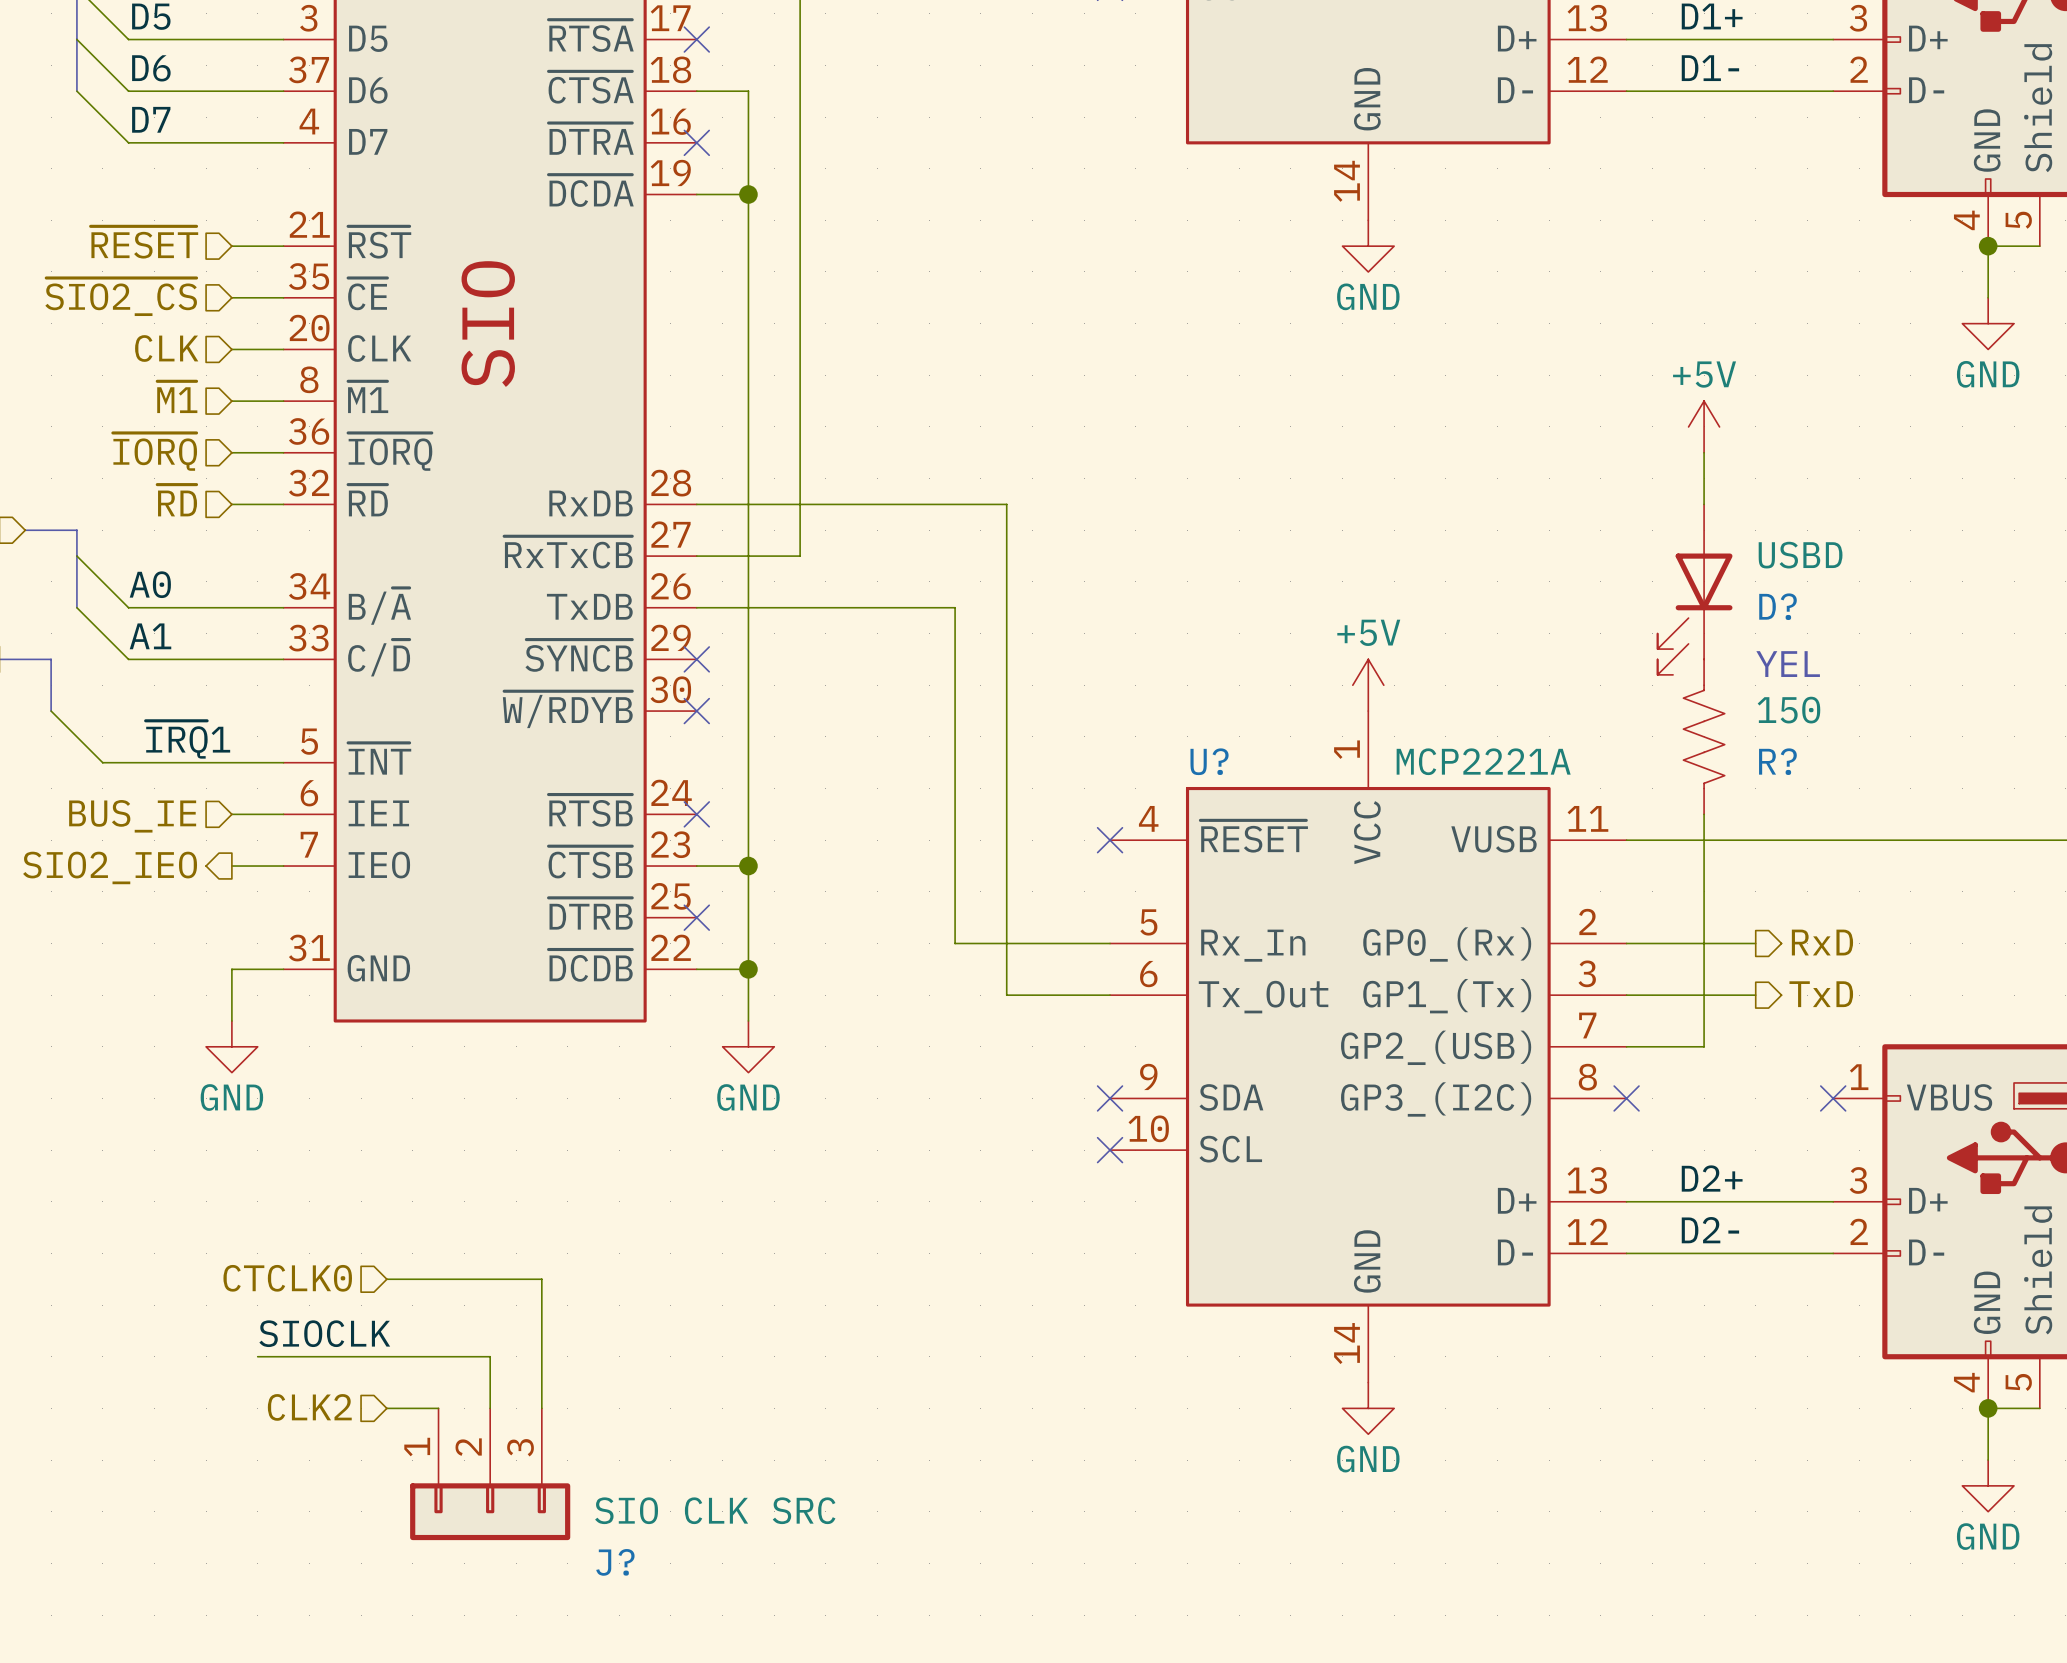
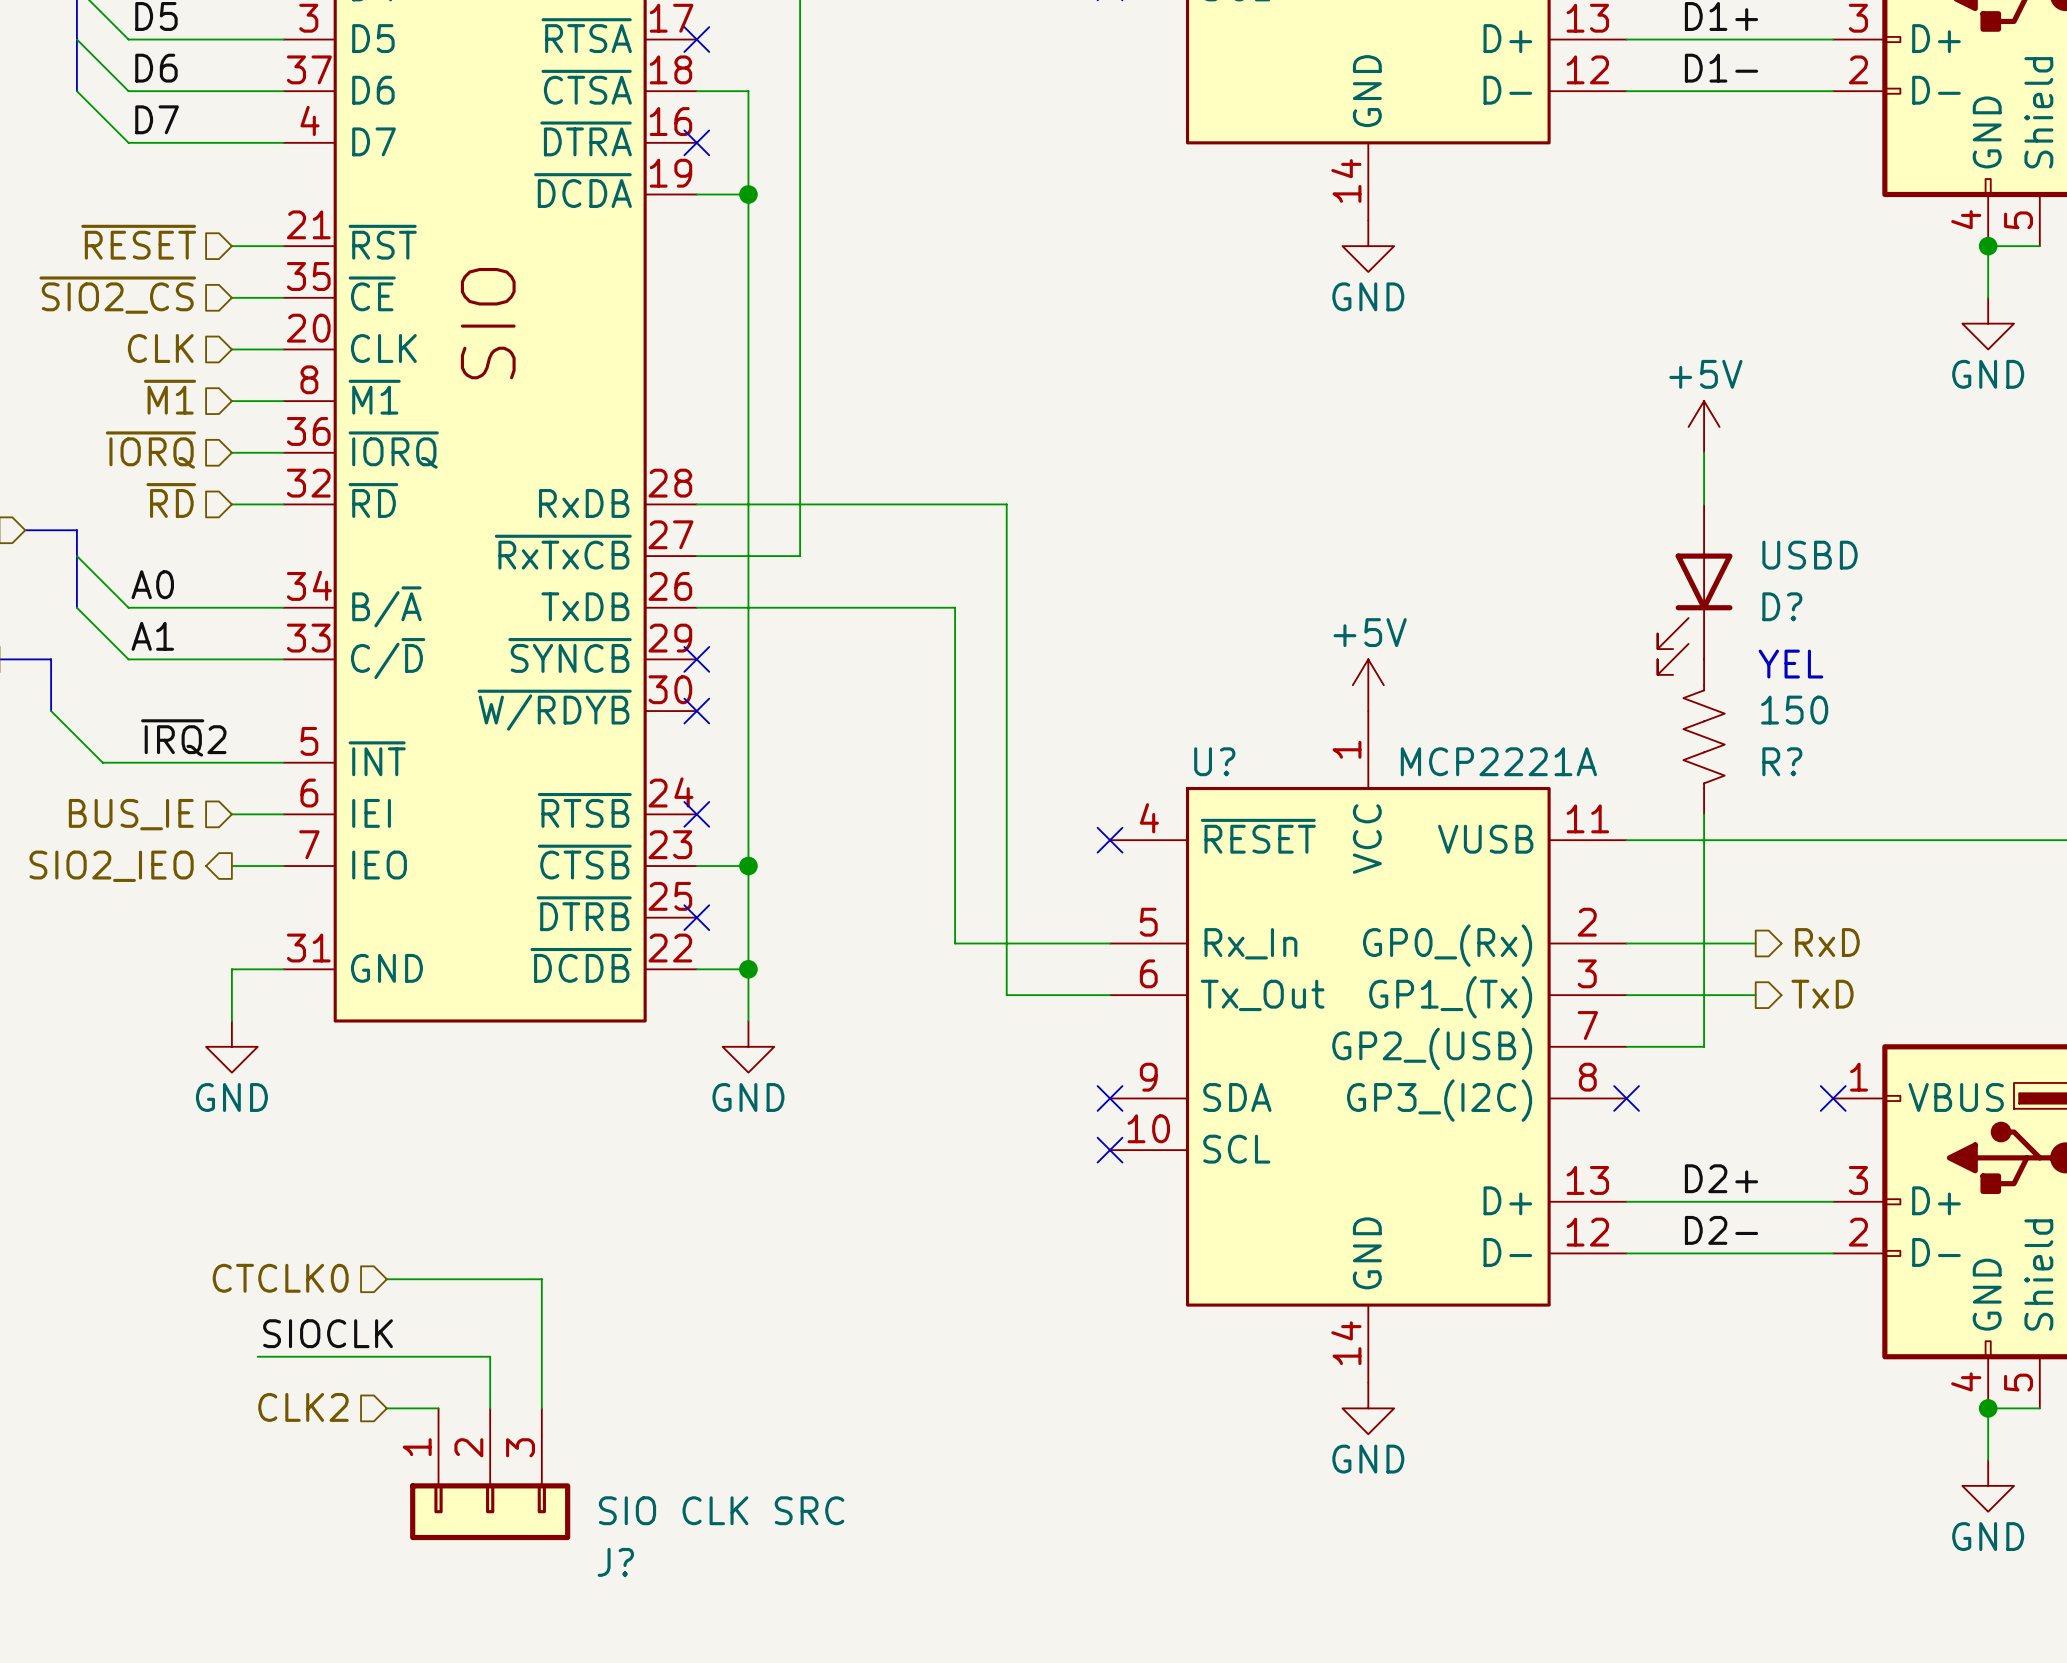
label: ~{IRQ}1 (187, 739) -> ~{IRQ}2 (183, 737)

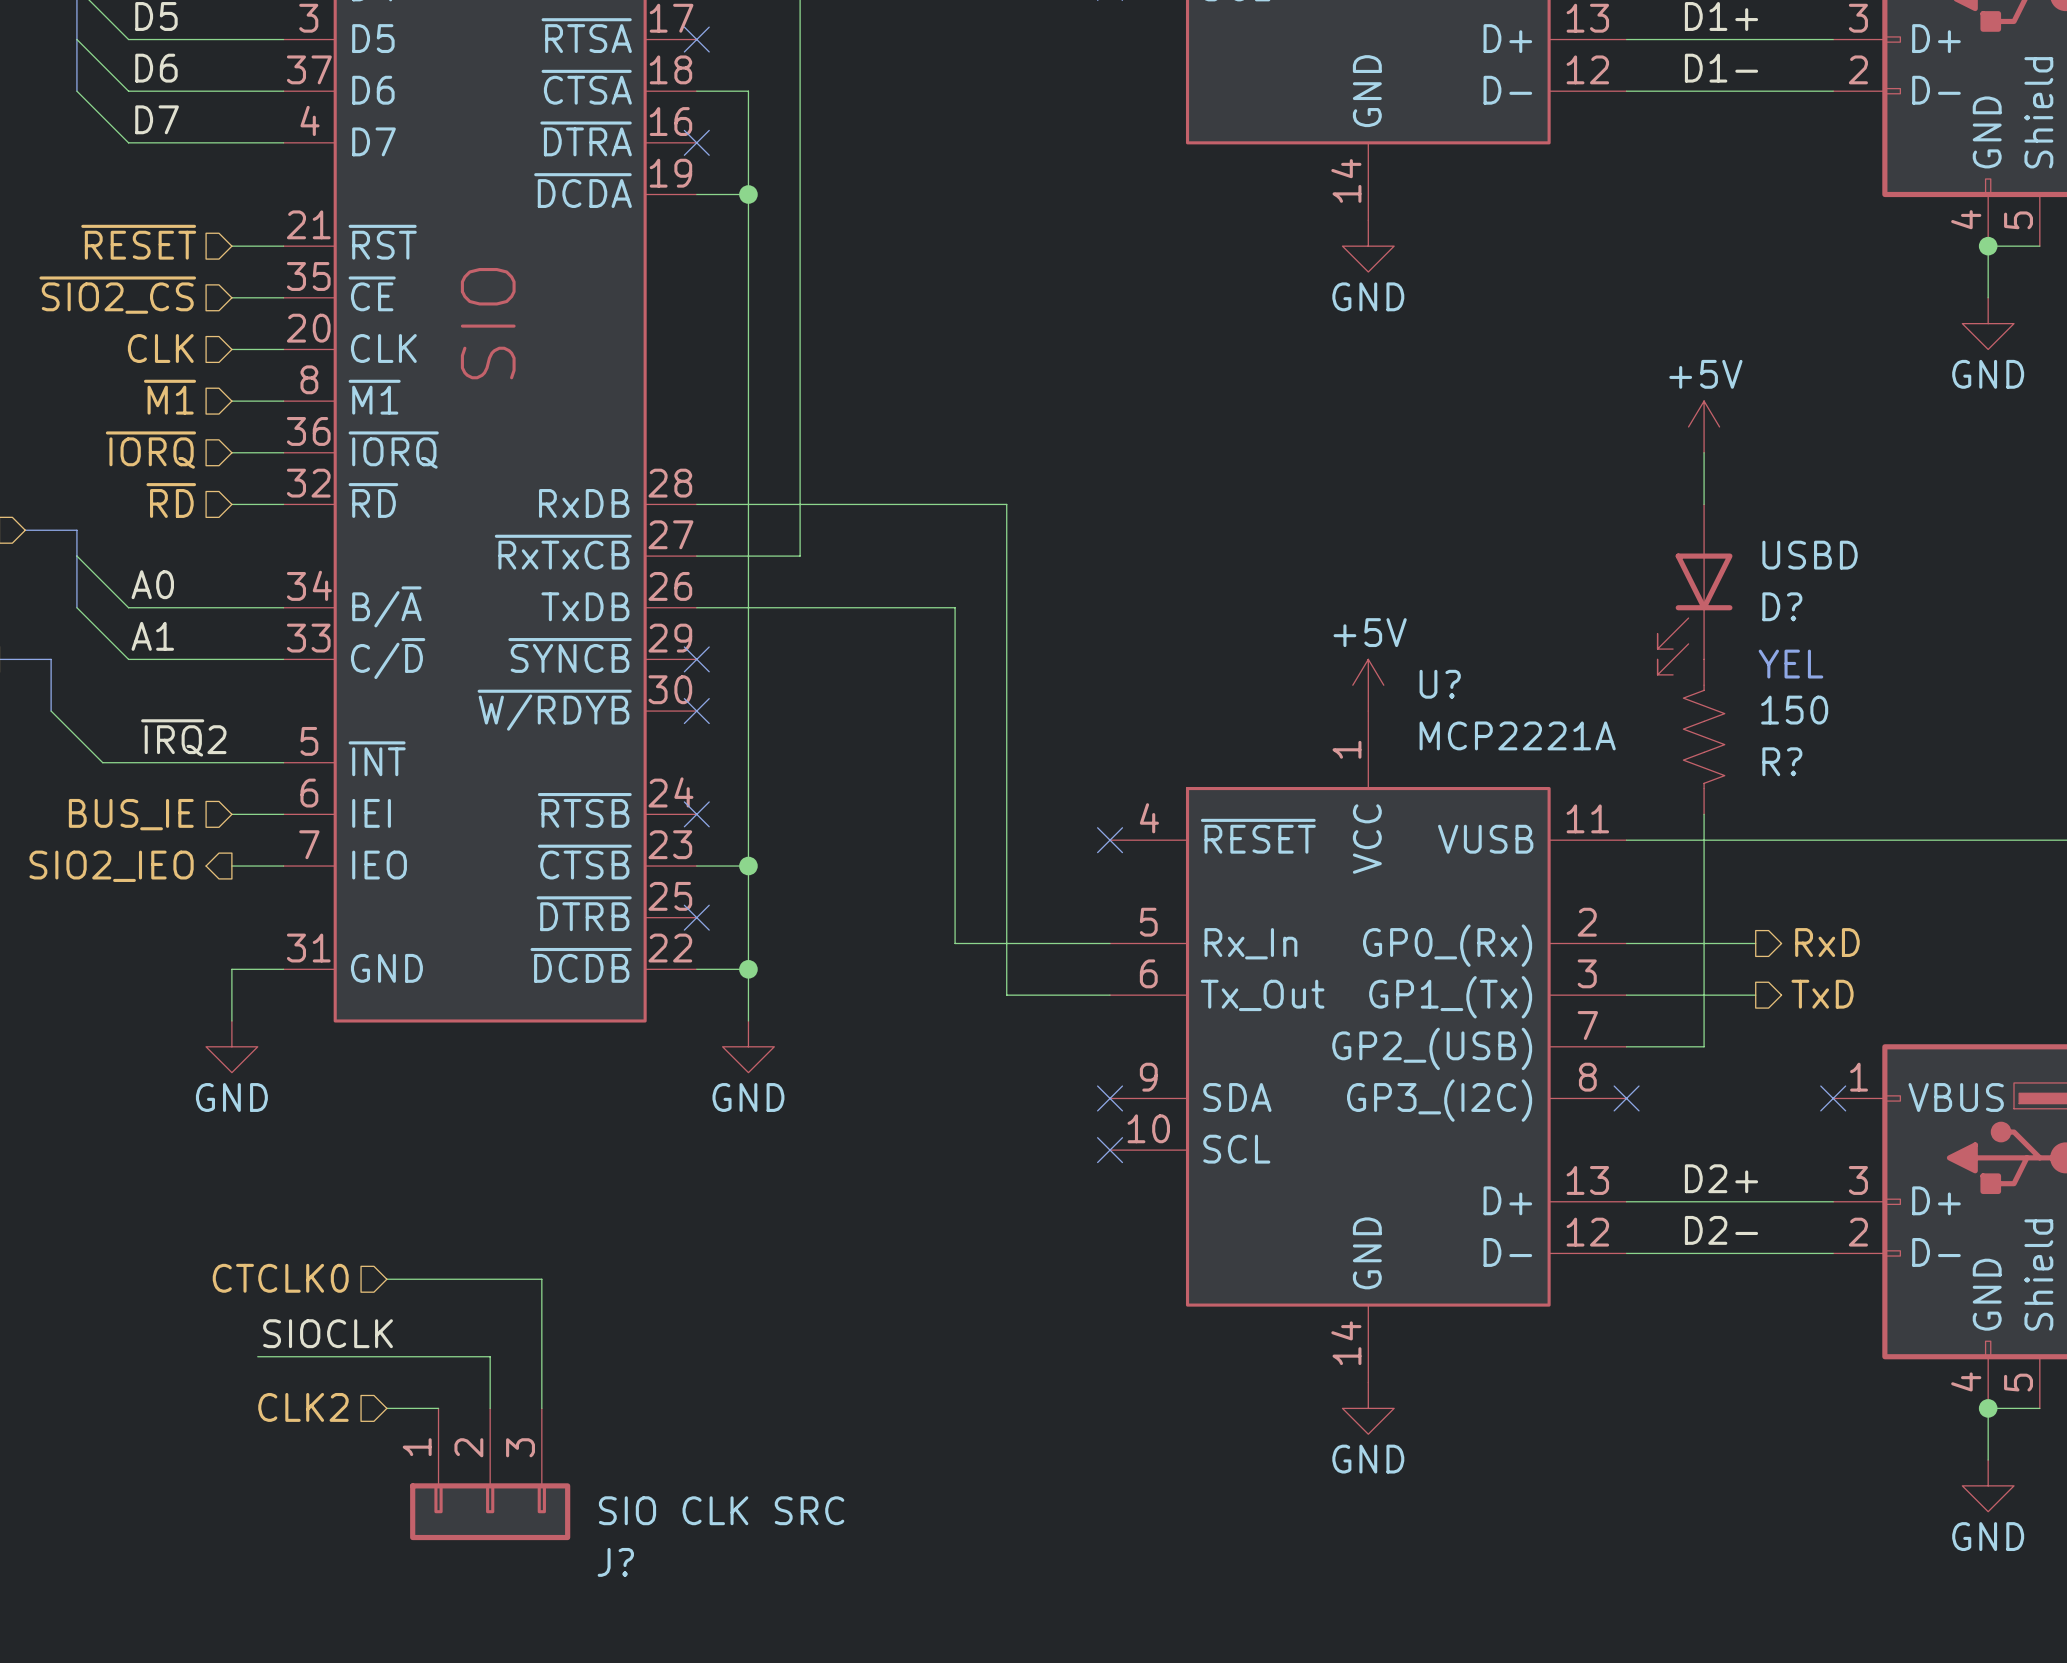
U? name position: U? (1214, 761) -> U? (1440, 684)
U? value position: MCP2221A (1498, 761) -> MCP2221A (1517, 735)

